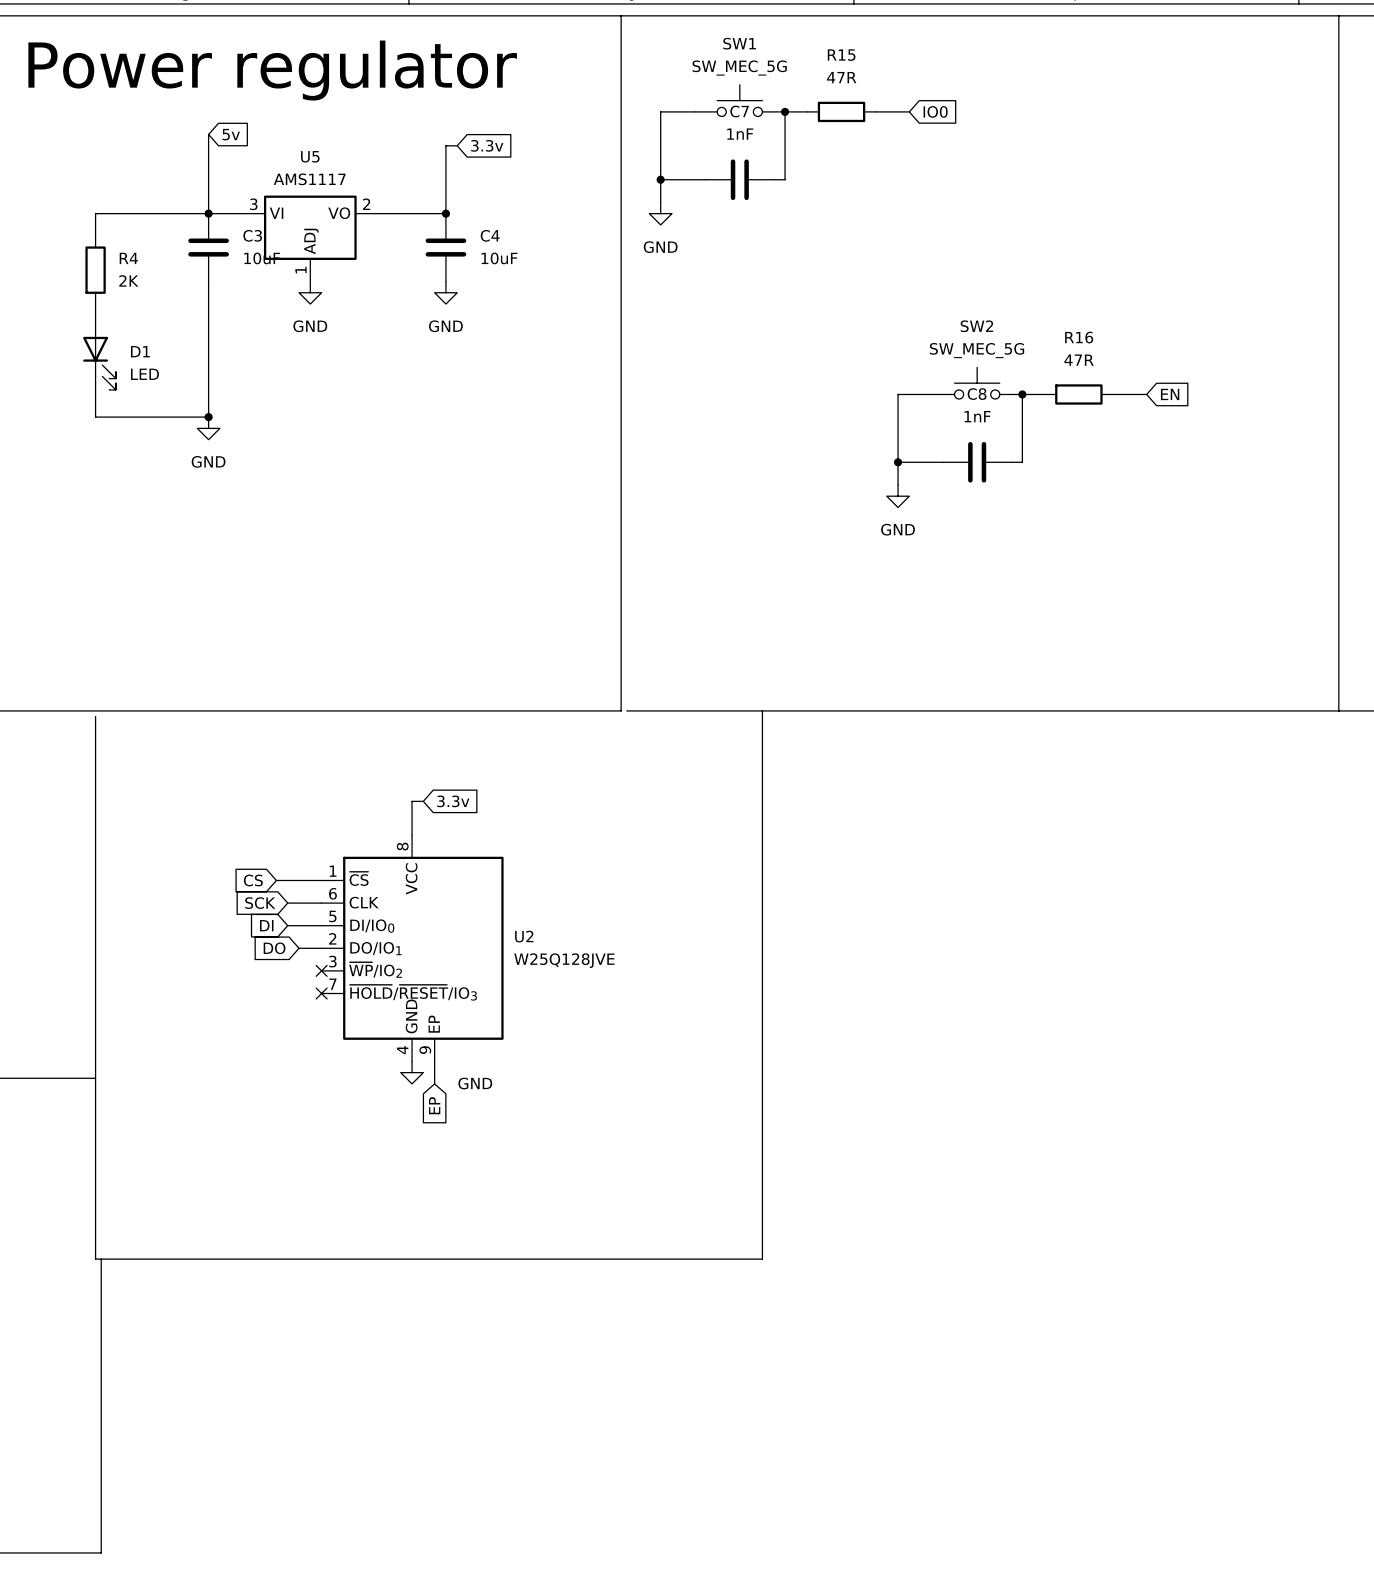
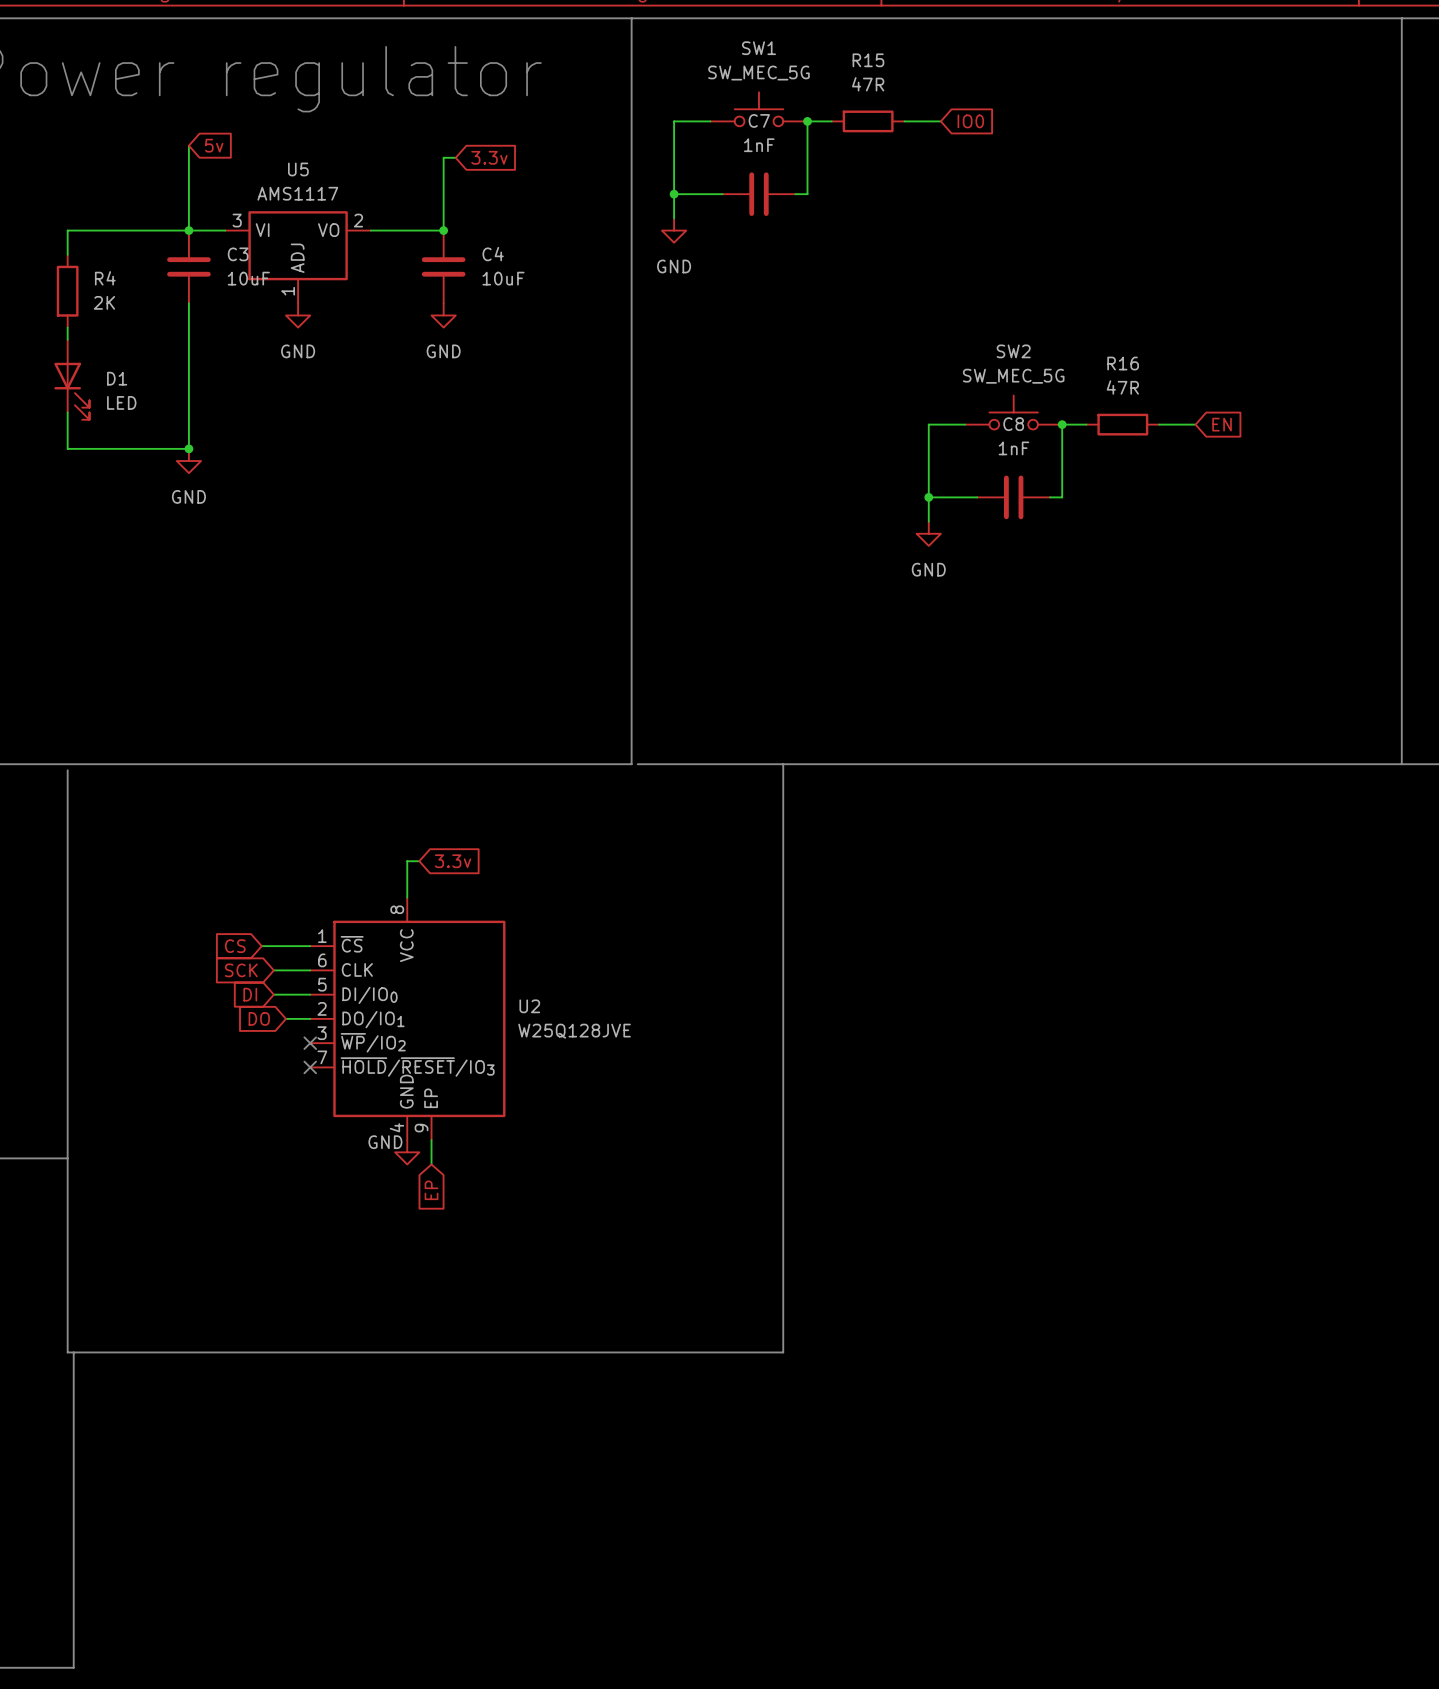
power symbol text position: GND (475, 1083) -> GND (385, 1142)

